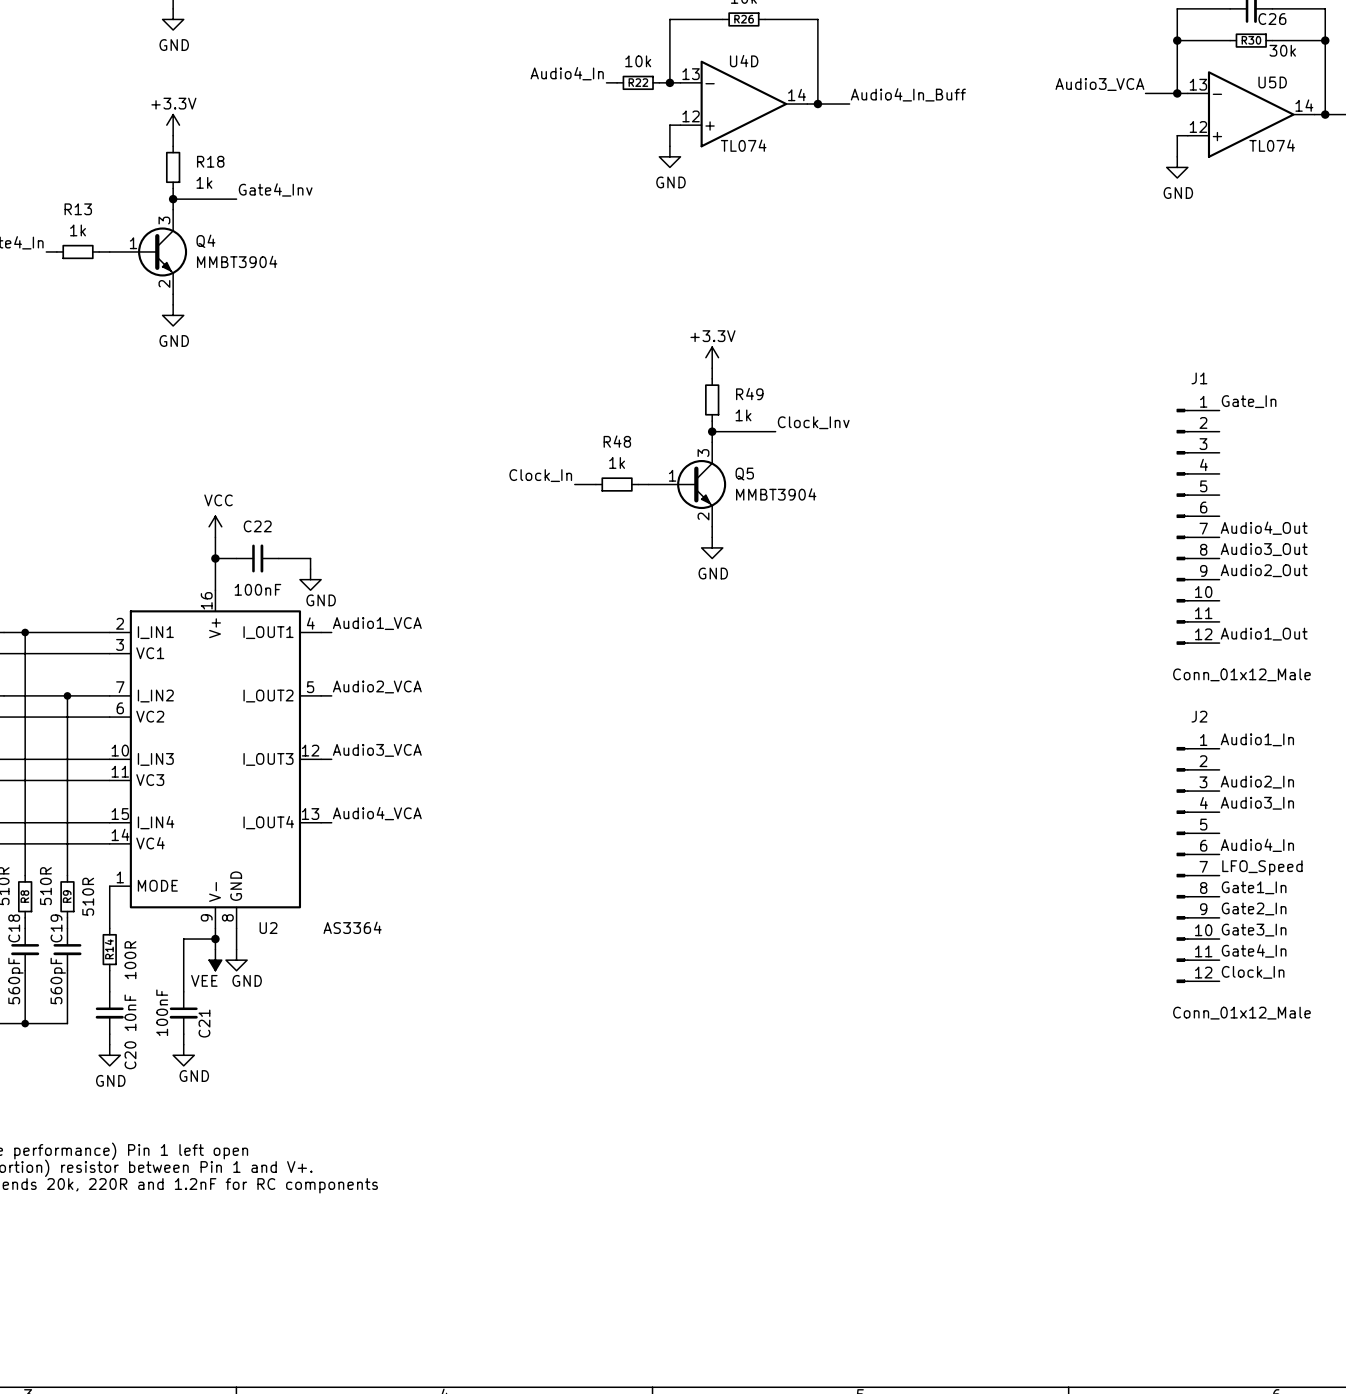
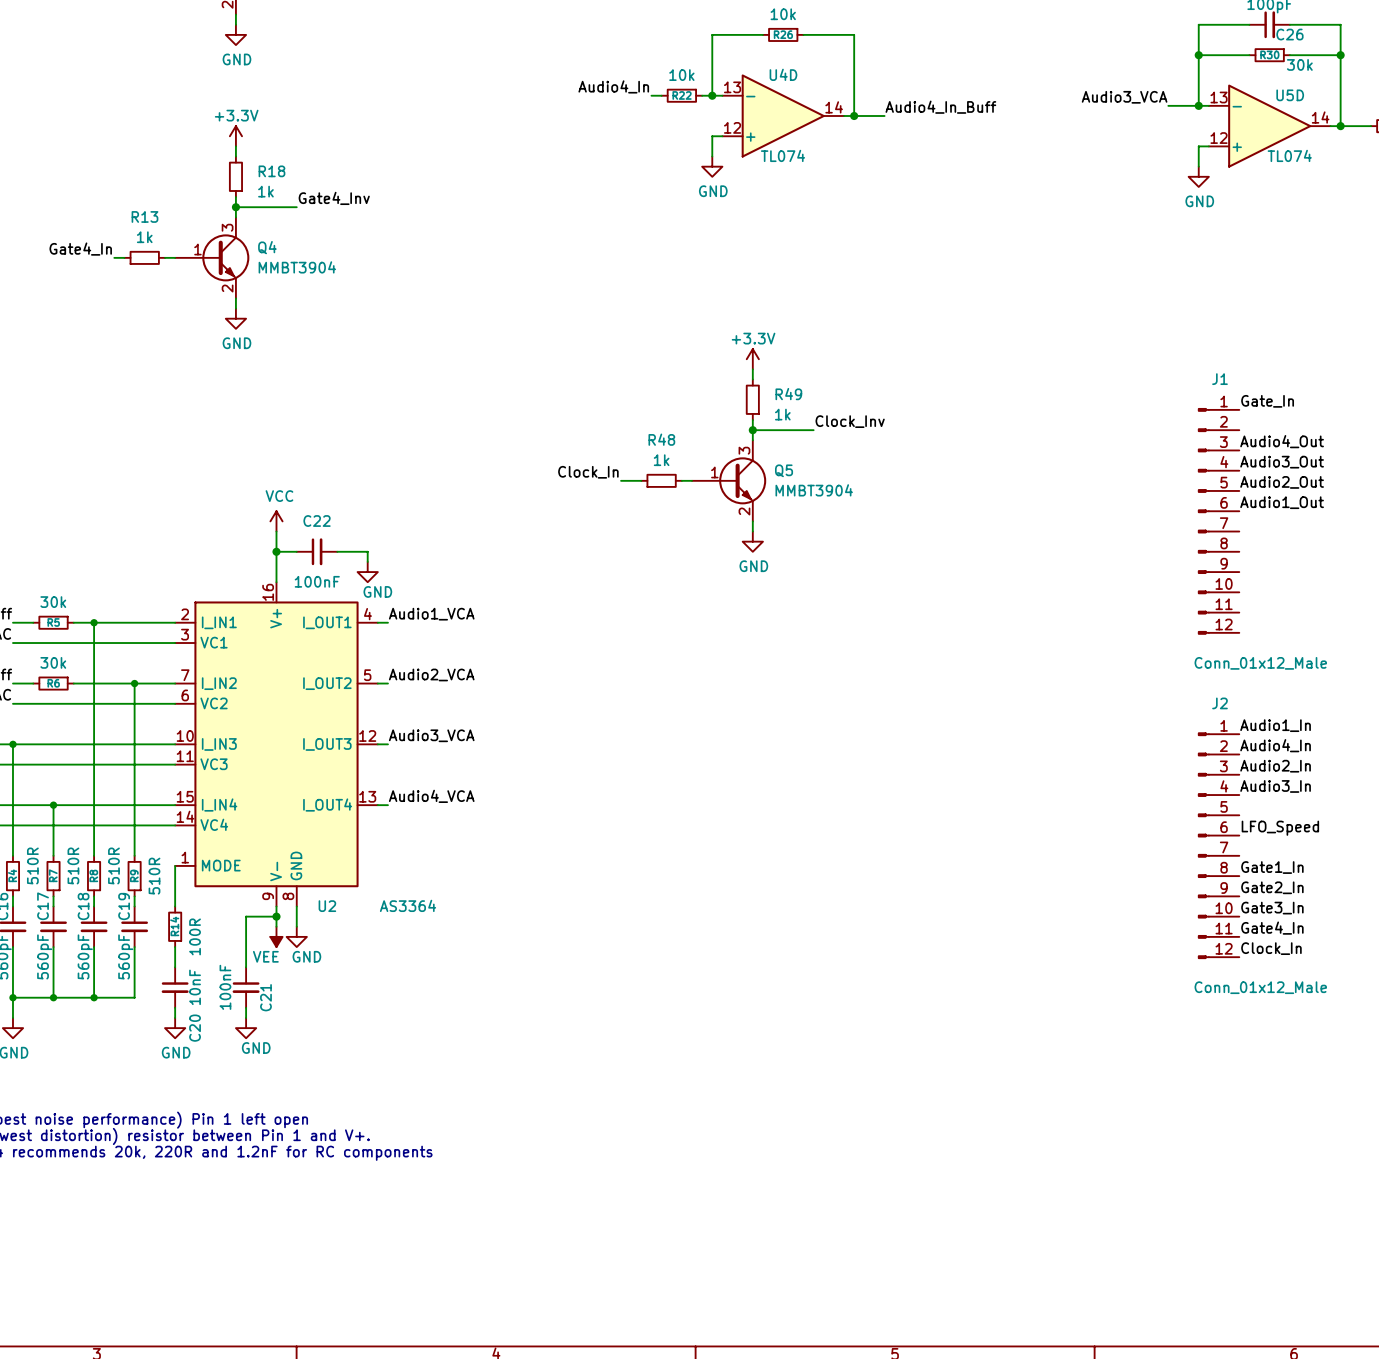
label position: Audio4_Out (1264, 528) -> Audio4_Out (1282, 441)
label position: Audio3_Out (1264, 549) -> Audio3_Out (1282, 462)
label position: Audio2_Out (1264, 570) -> Audio2_Out (1282, 482)
label position: Audio1_Out (1264, 634) -> Audio1_Out (1282, 502)
label: none -> Audio4_In (1275, 745)
label: Audio4_In (1257, 845) -> LFO_Speed (1280, 828)
label: LFO_Speed (1262, 867) -> none

